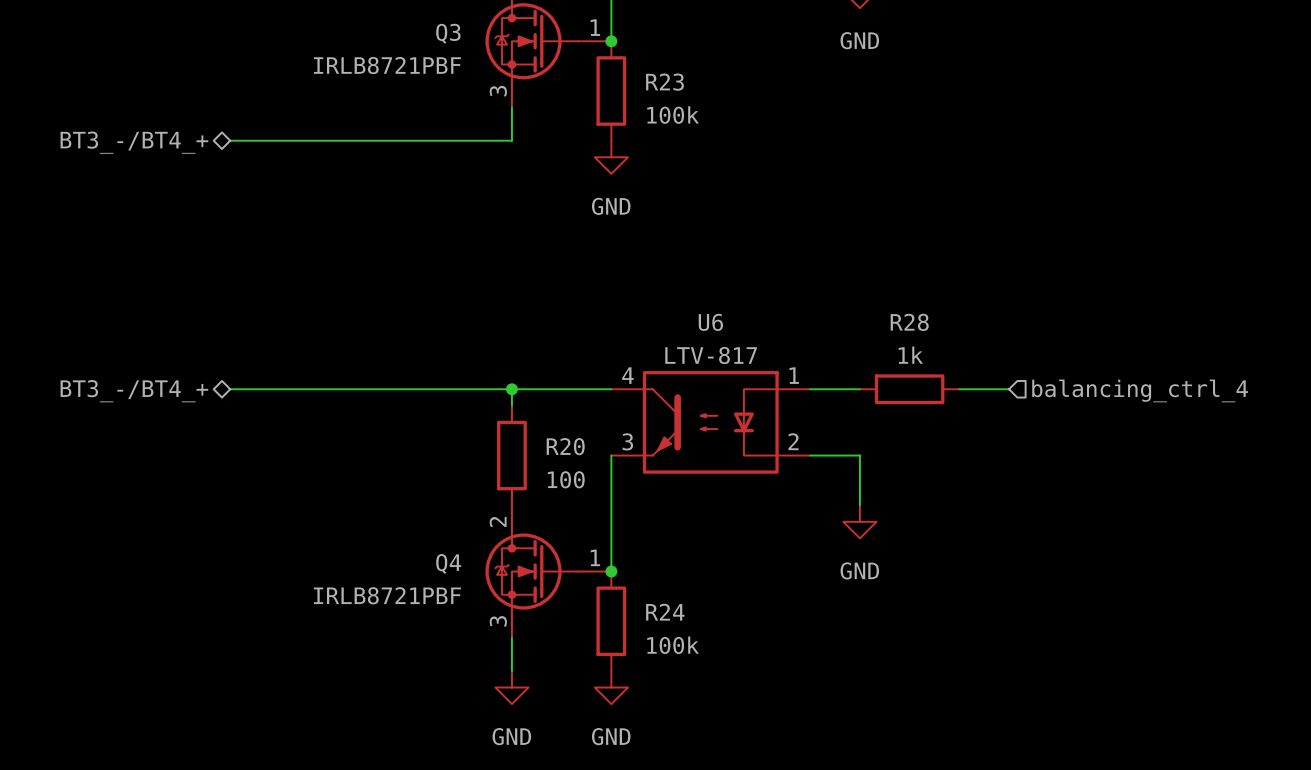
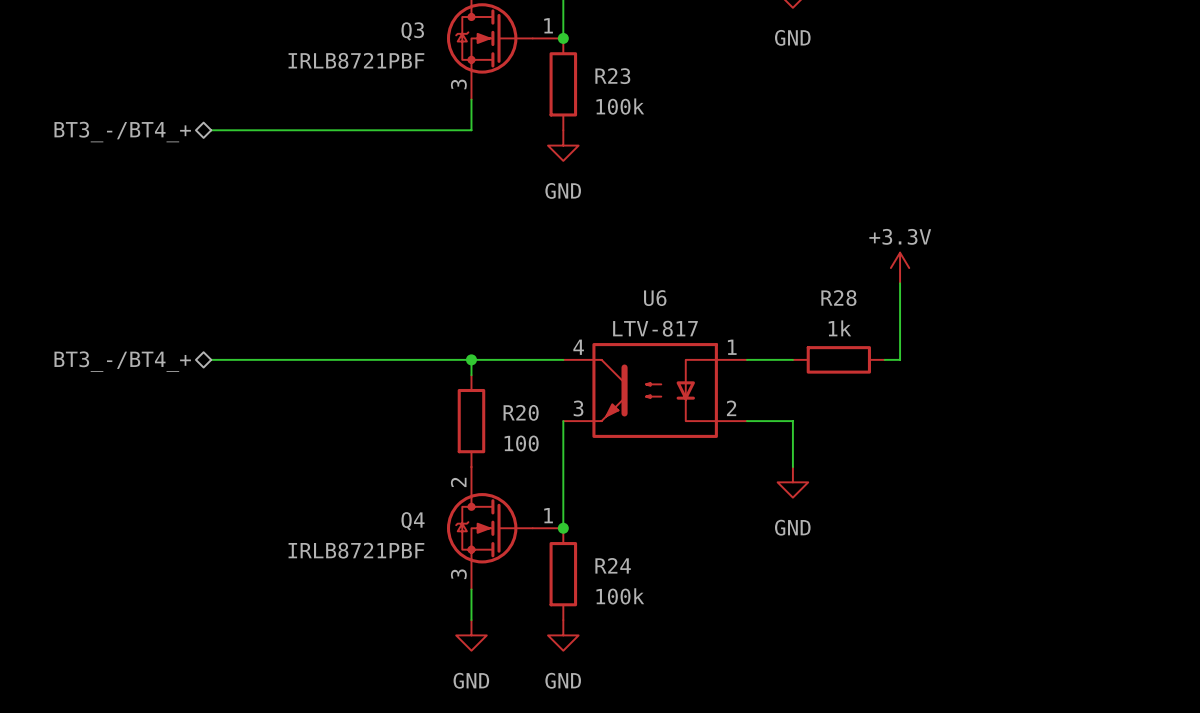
power symbol: none -> +3.3V (900, 268)
wire: (975, 389) (1009, 389) -> (900, 359) (900, 283)
hierarchical label: balancing_ctrl_4 (1140, 390) -> none

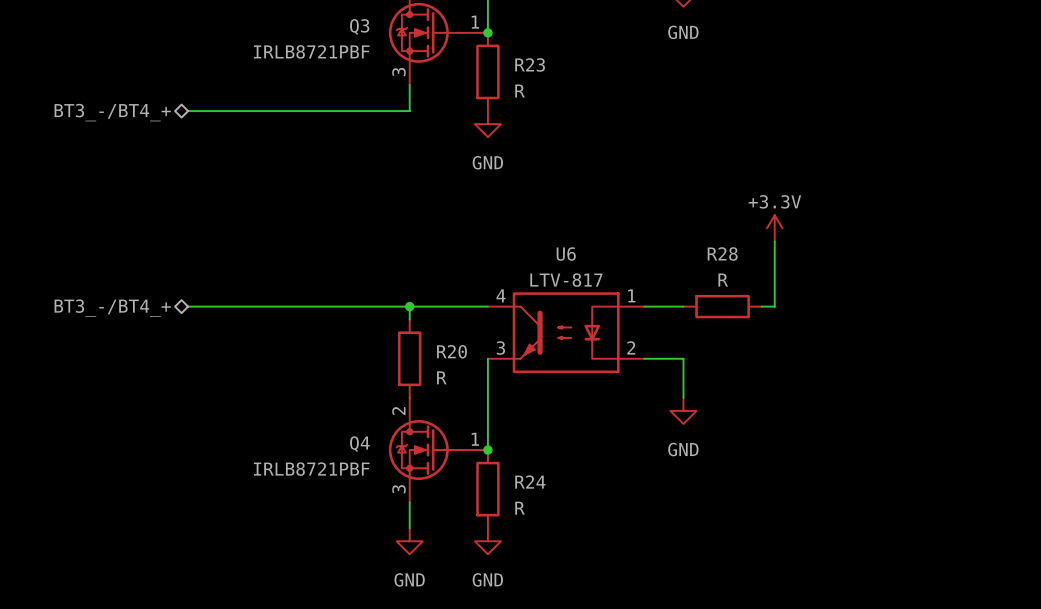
R23 value: 100k (620, 106) -> R (520, 91)
R28 value: 1k (839, 328) -> R (723, 280)
R20 value: 100 (521, 443) -> R (441, 377)
R24 value: 100k (620, 596) -> R (520, 508)

